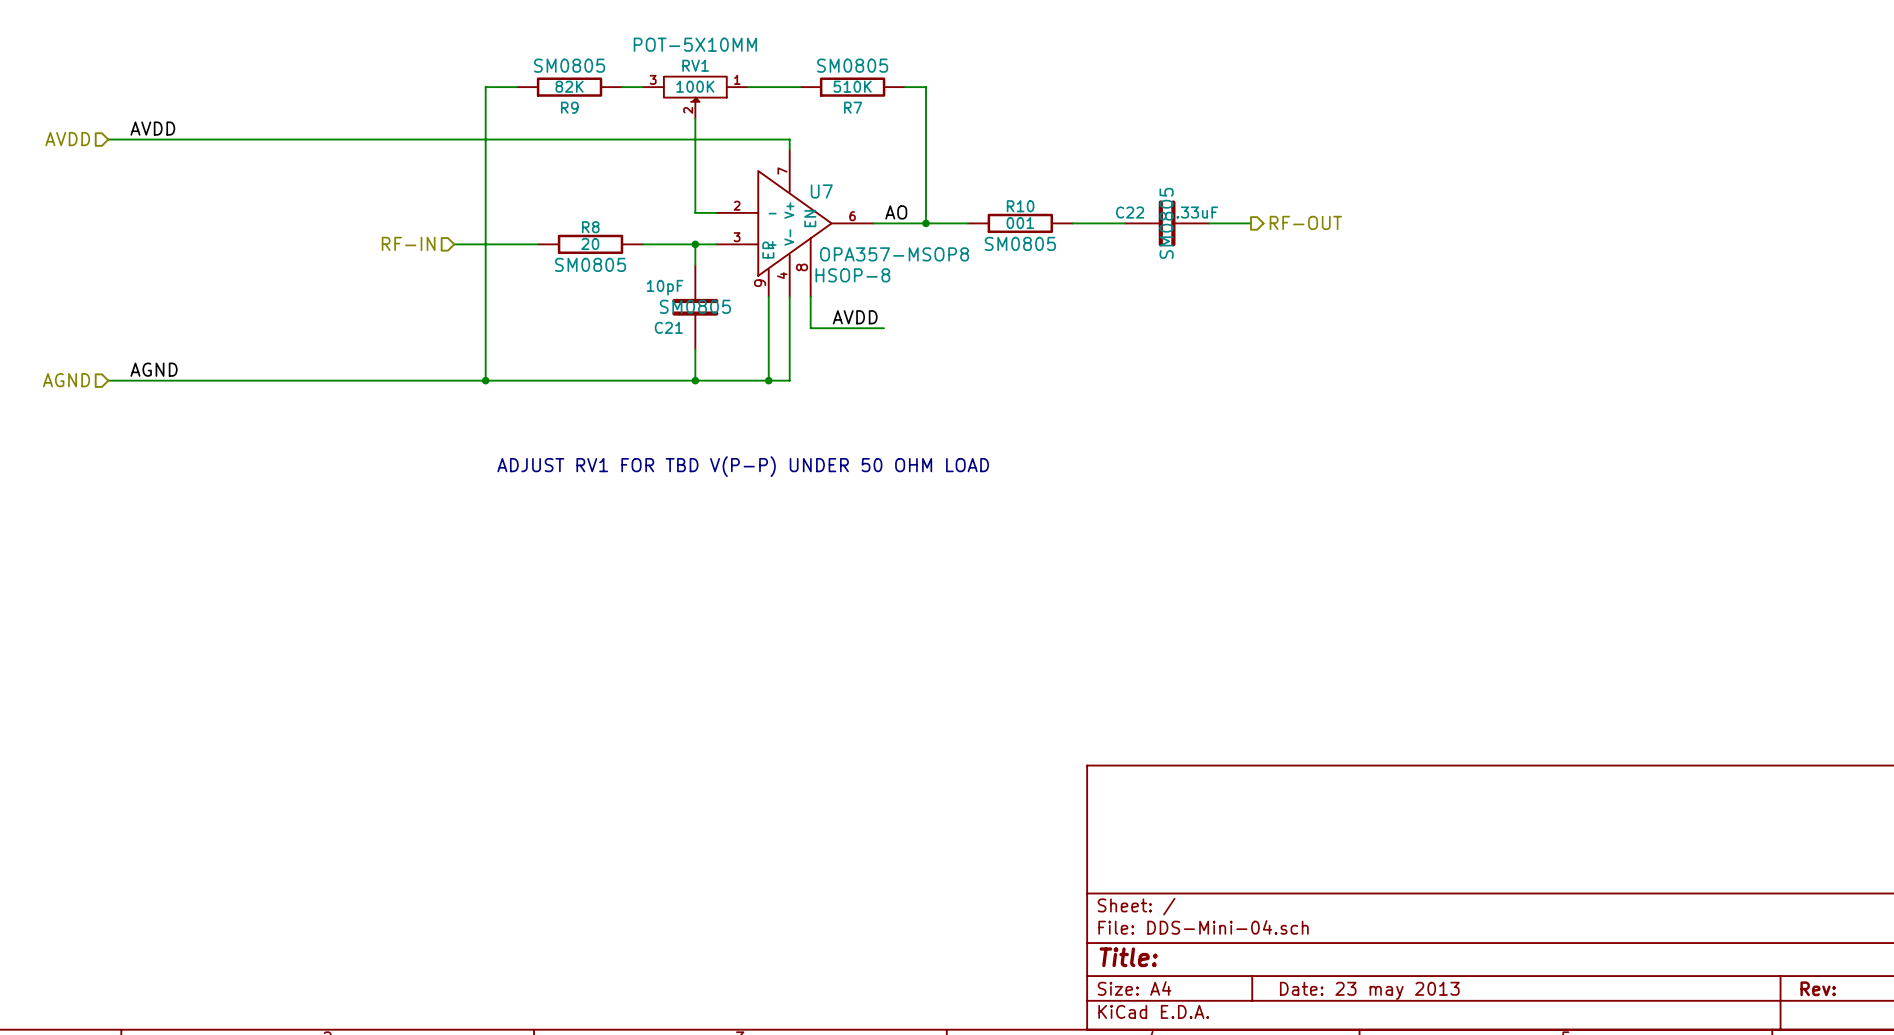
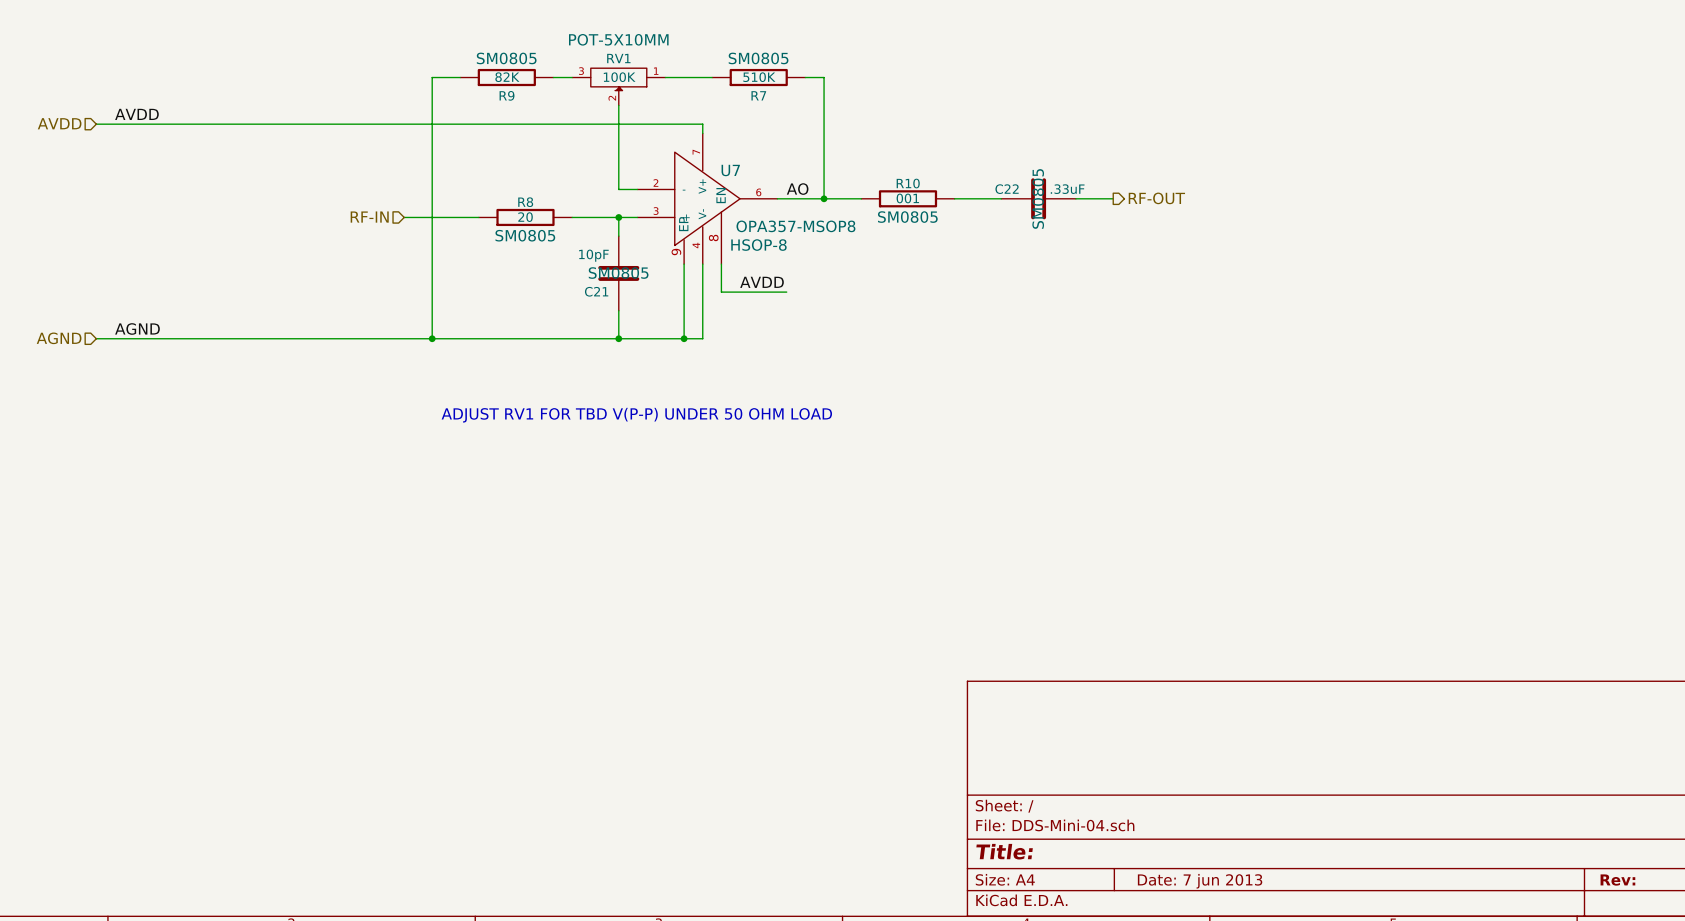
title block: Date: 23 may 2013 (1369, 990) -> Date: 7 jun 2013 (1200, 881)

